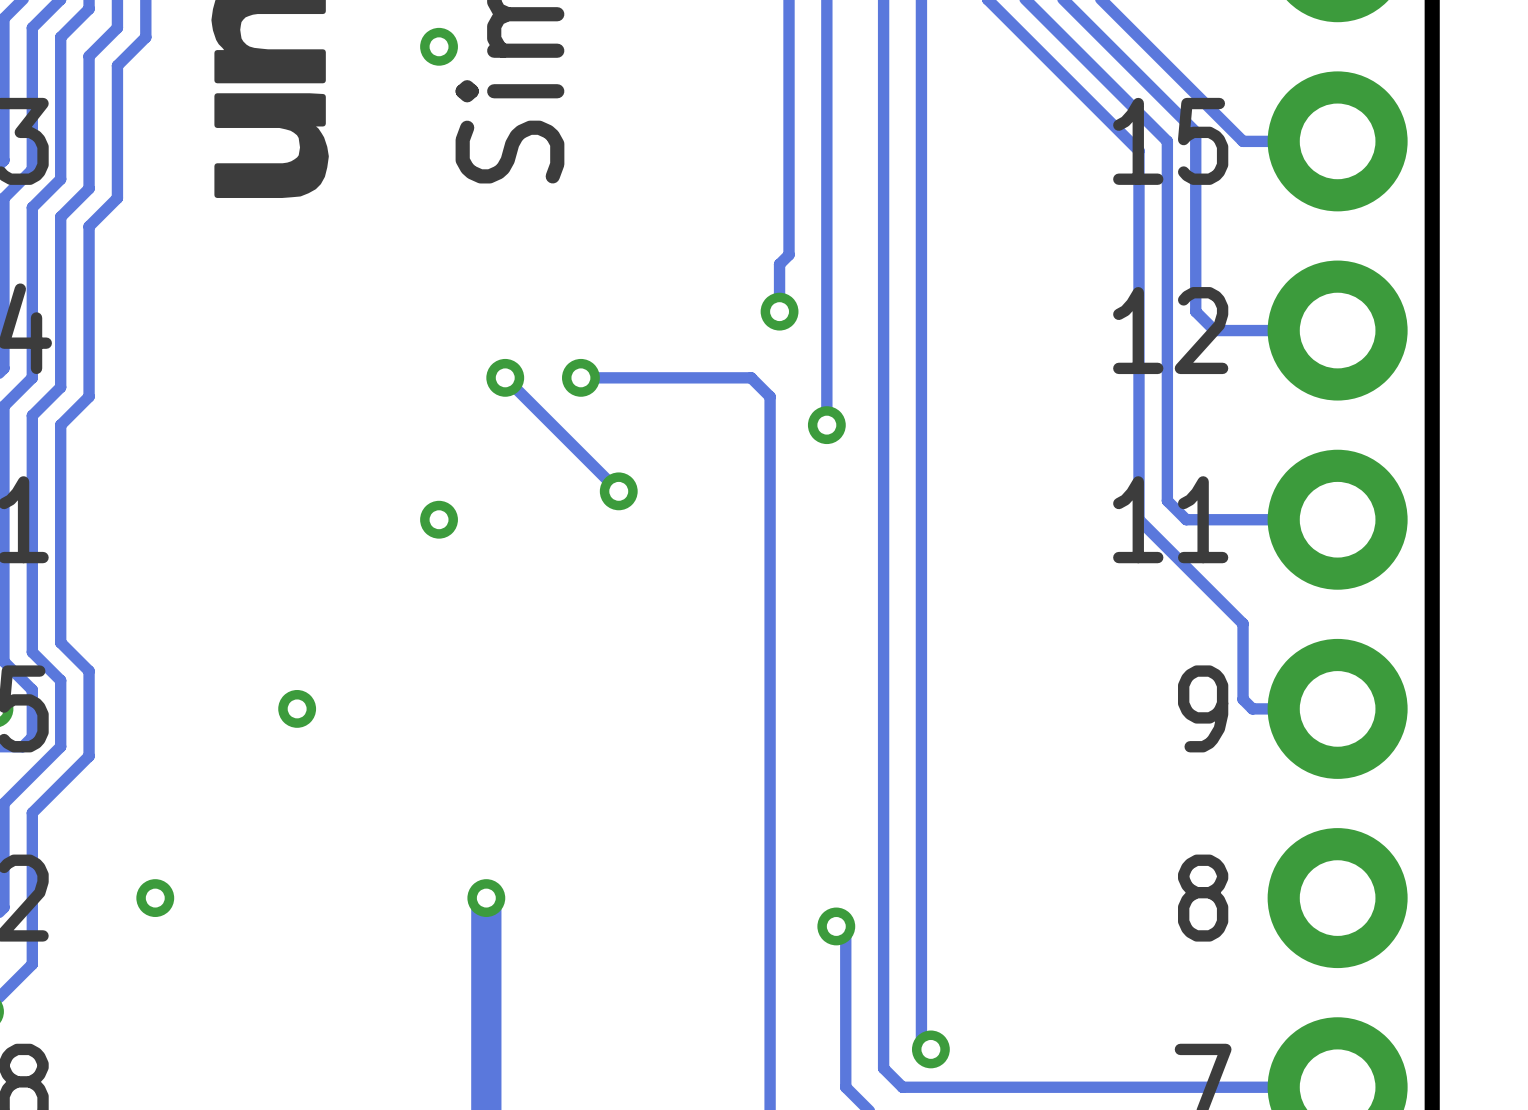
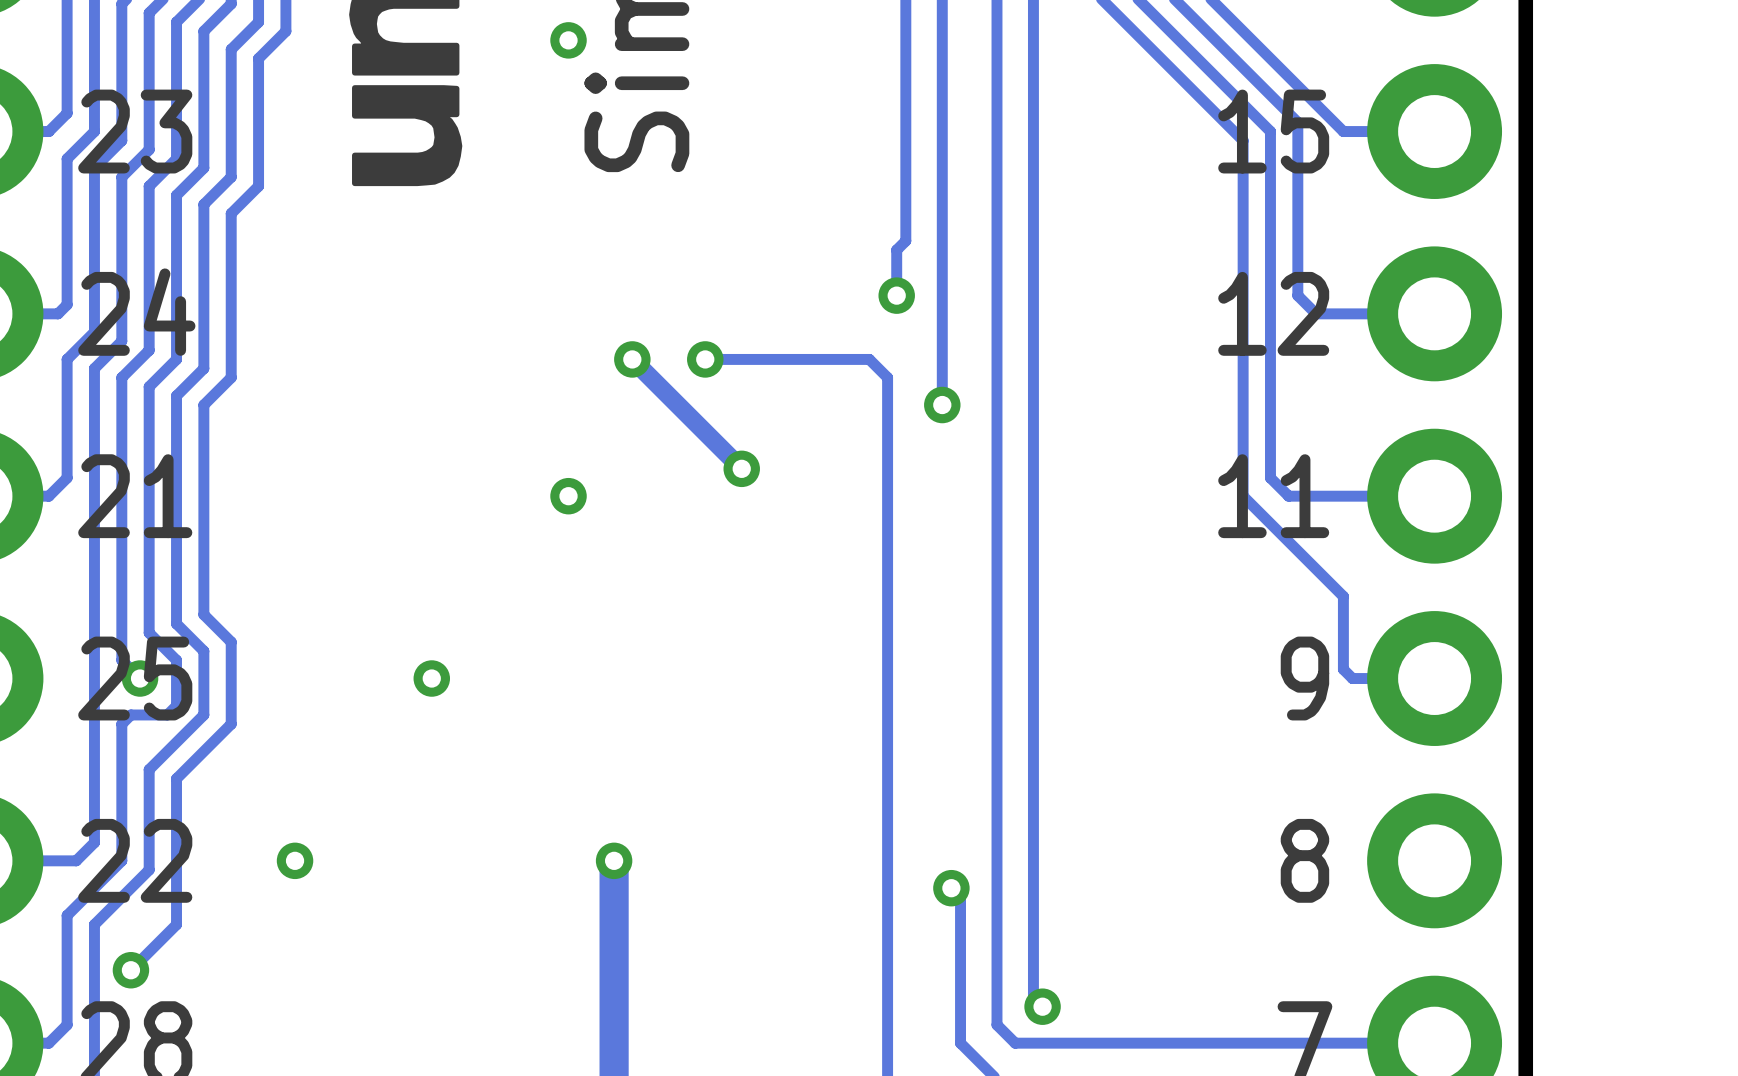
track width: thin (505, 377) (618, 491) -> thick (632, 359) (741, 468)

